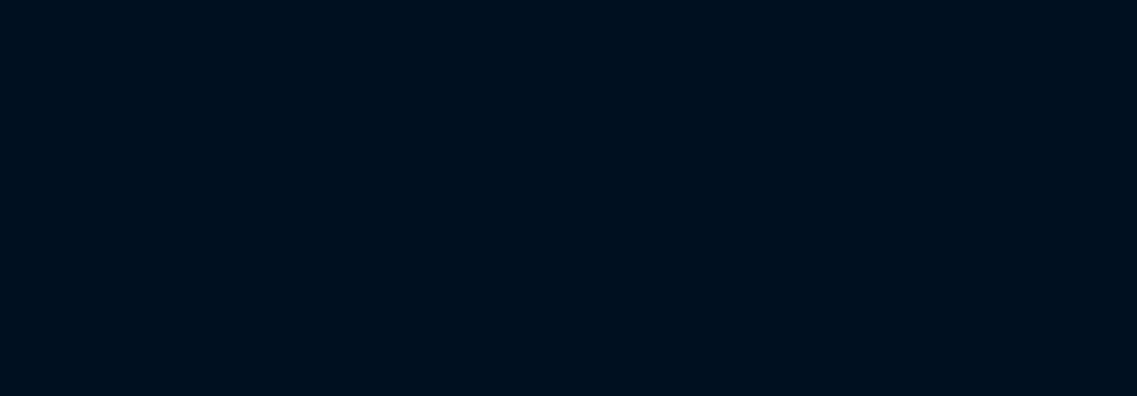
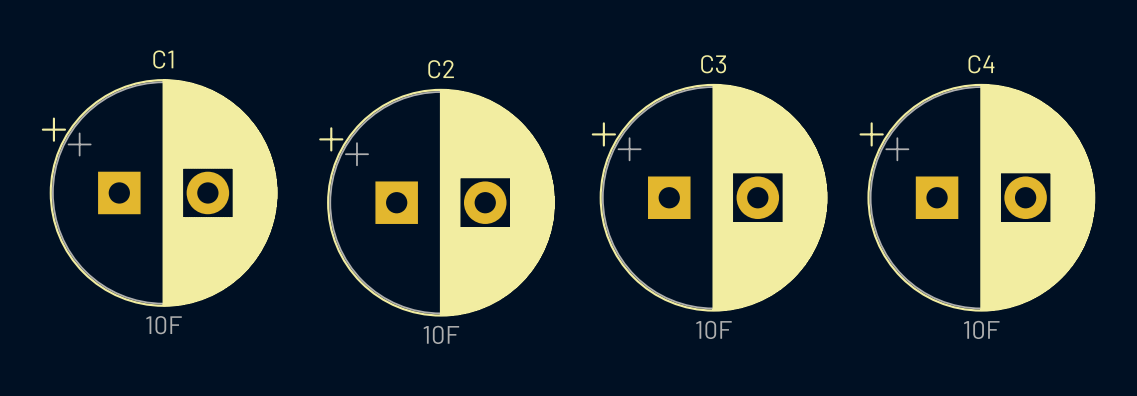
C1: none -> 10F (159, 192)
C3: none -> 10F (709, 197)
C4: none -> 10F (977, 197)
C2: none -> 10F (437, 202)

